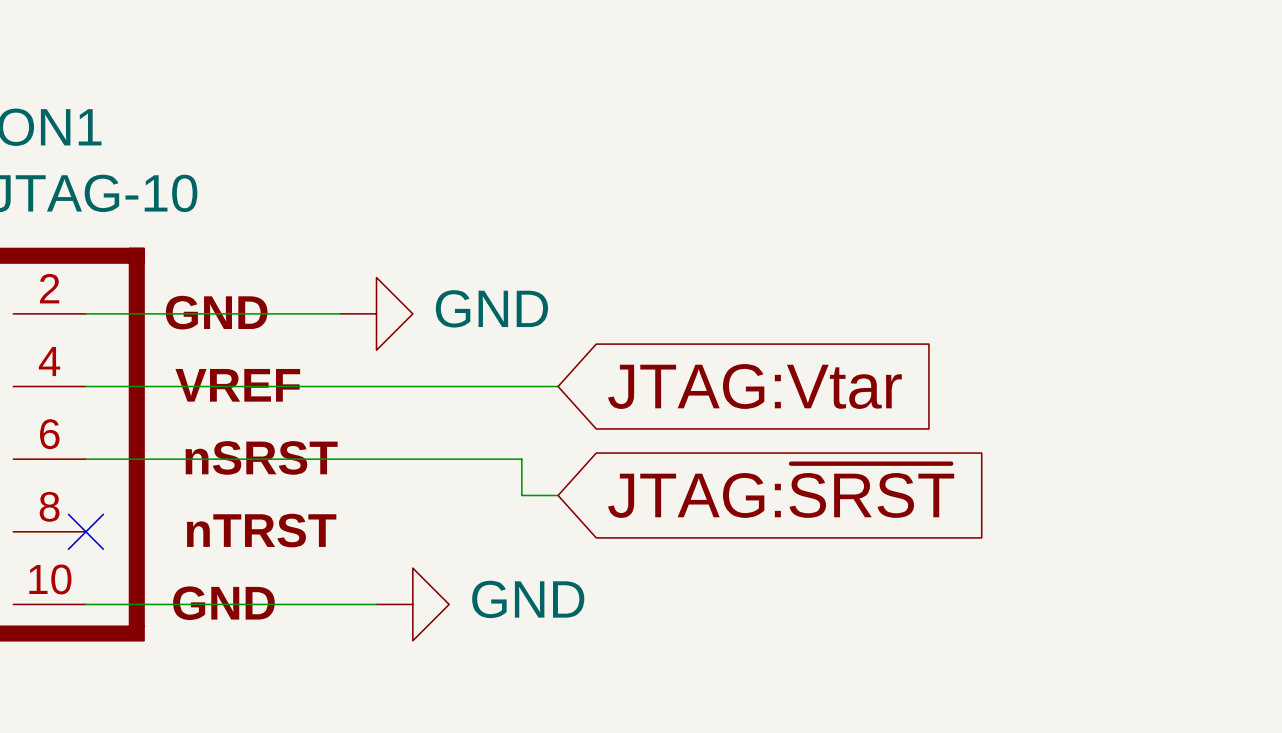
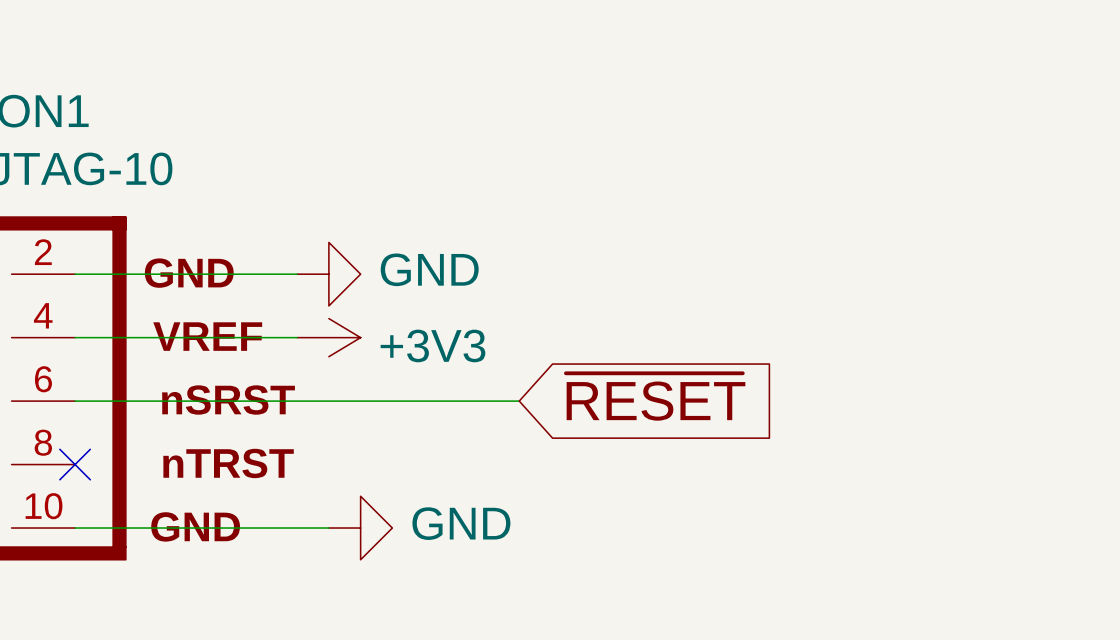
wire: (340, 386) (558, 386) -> none
power symbol: none -> +3V3 (328, 337)
global label: JTAG:Vtar (754, 386) -> none
global label: none -> ~{RESET} (655, 396)
wire: (521, 459) (521, 495) (558, 495) -> (455, 401) (519, 401)
global label: JTAG:~{SRST} (781, 490) -> none

